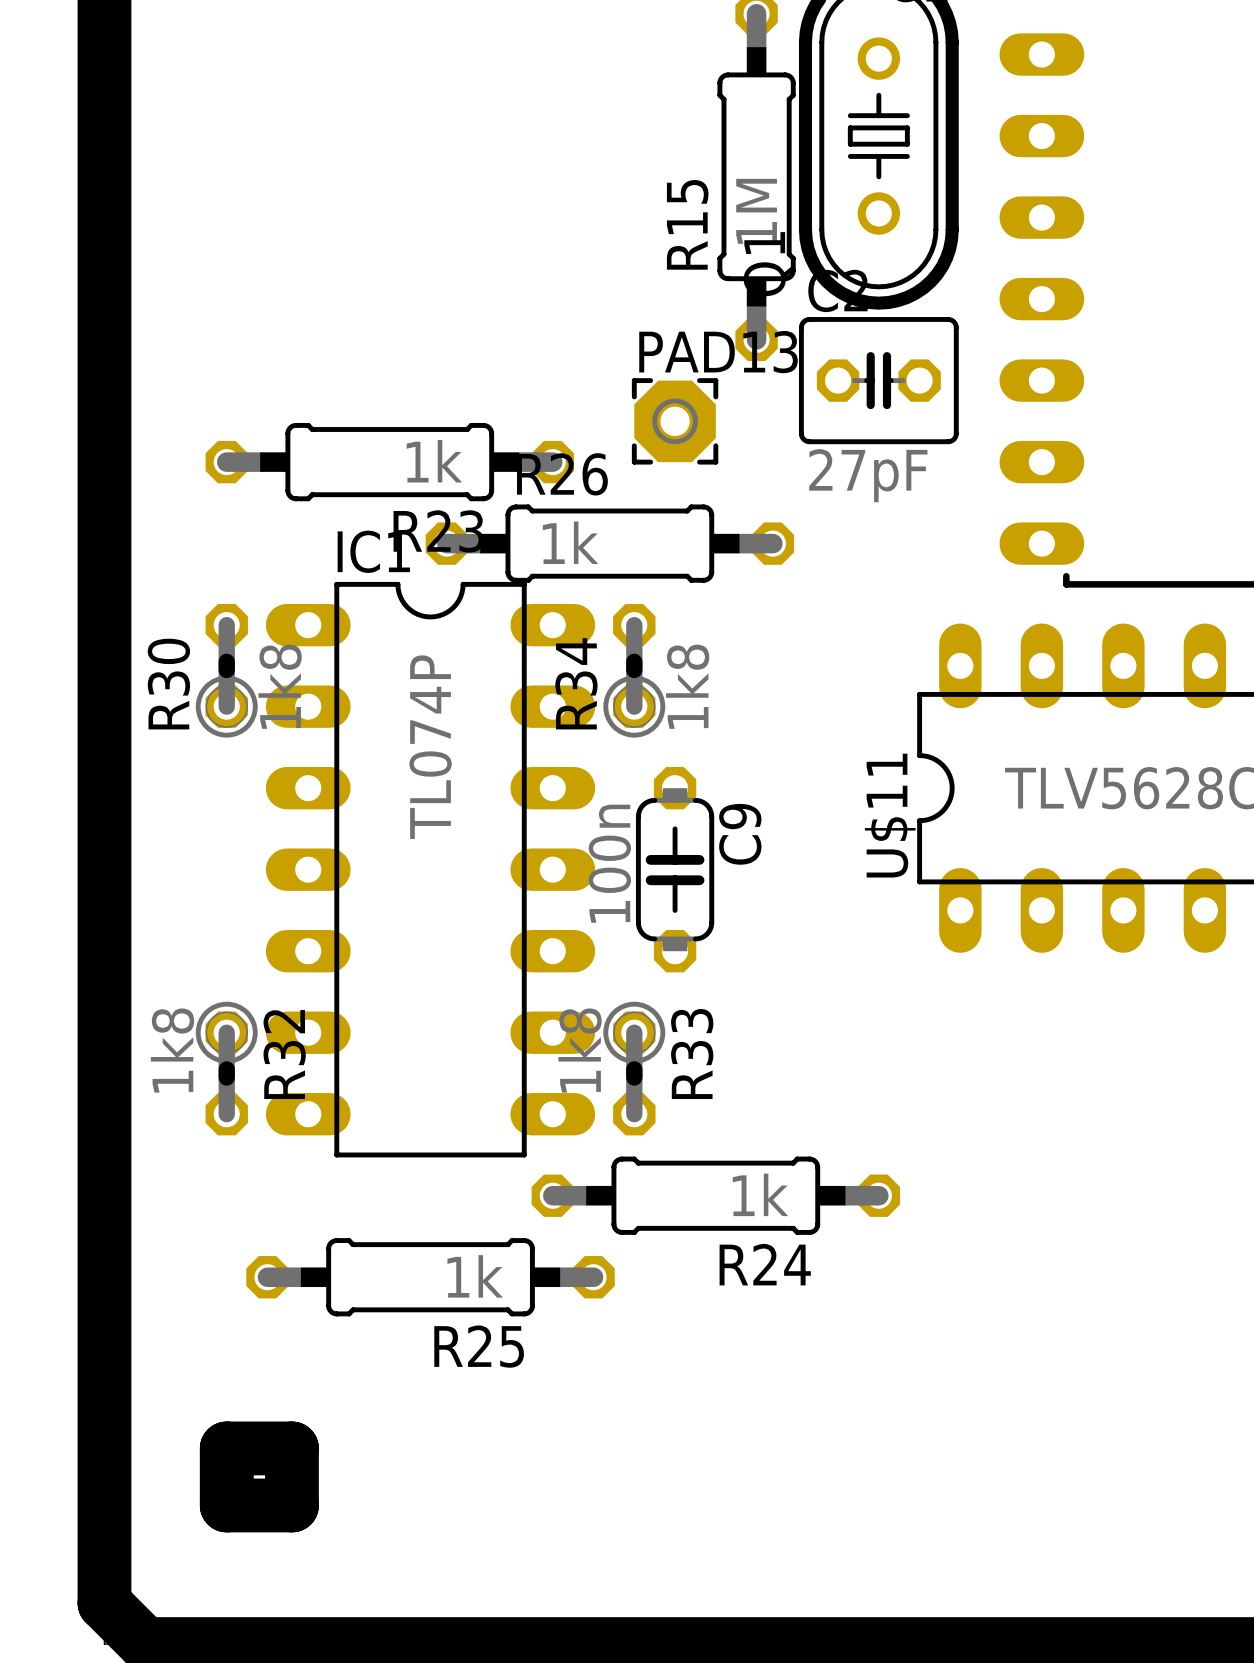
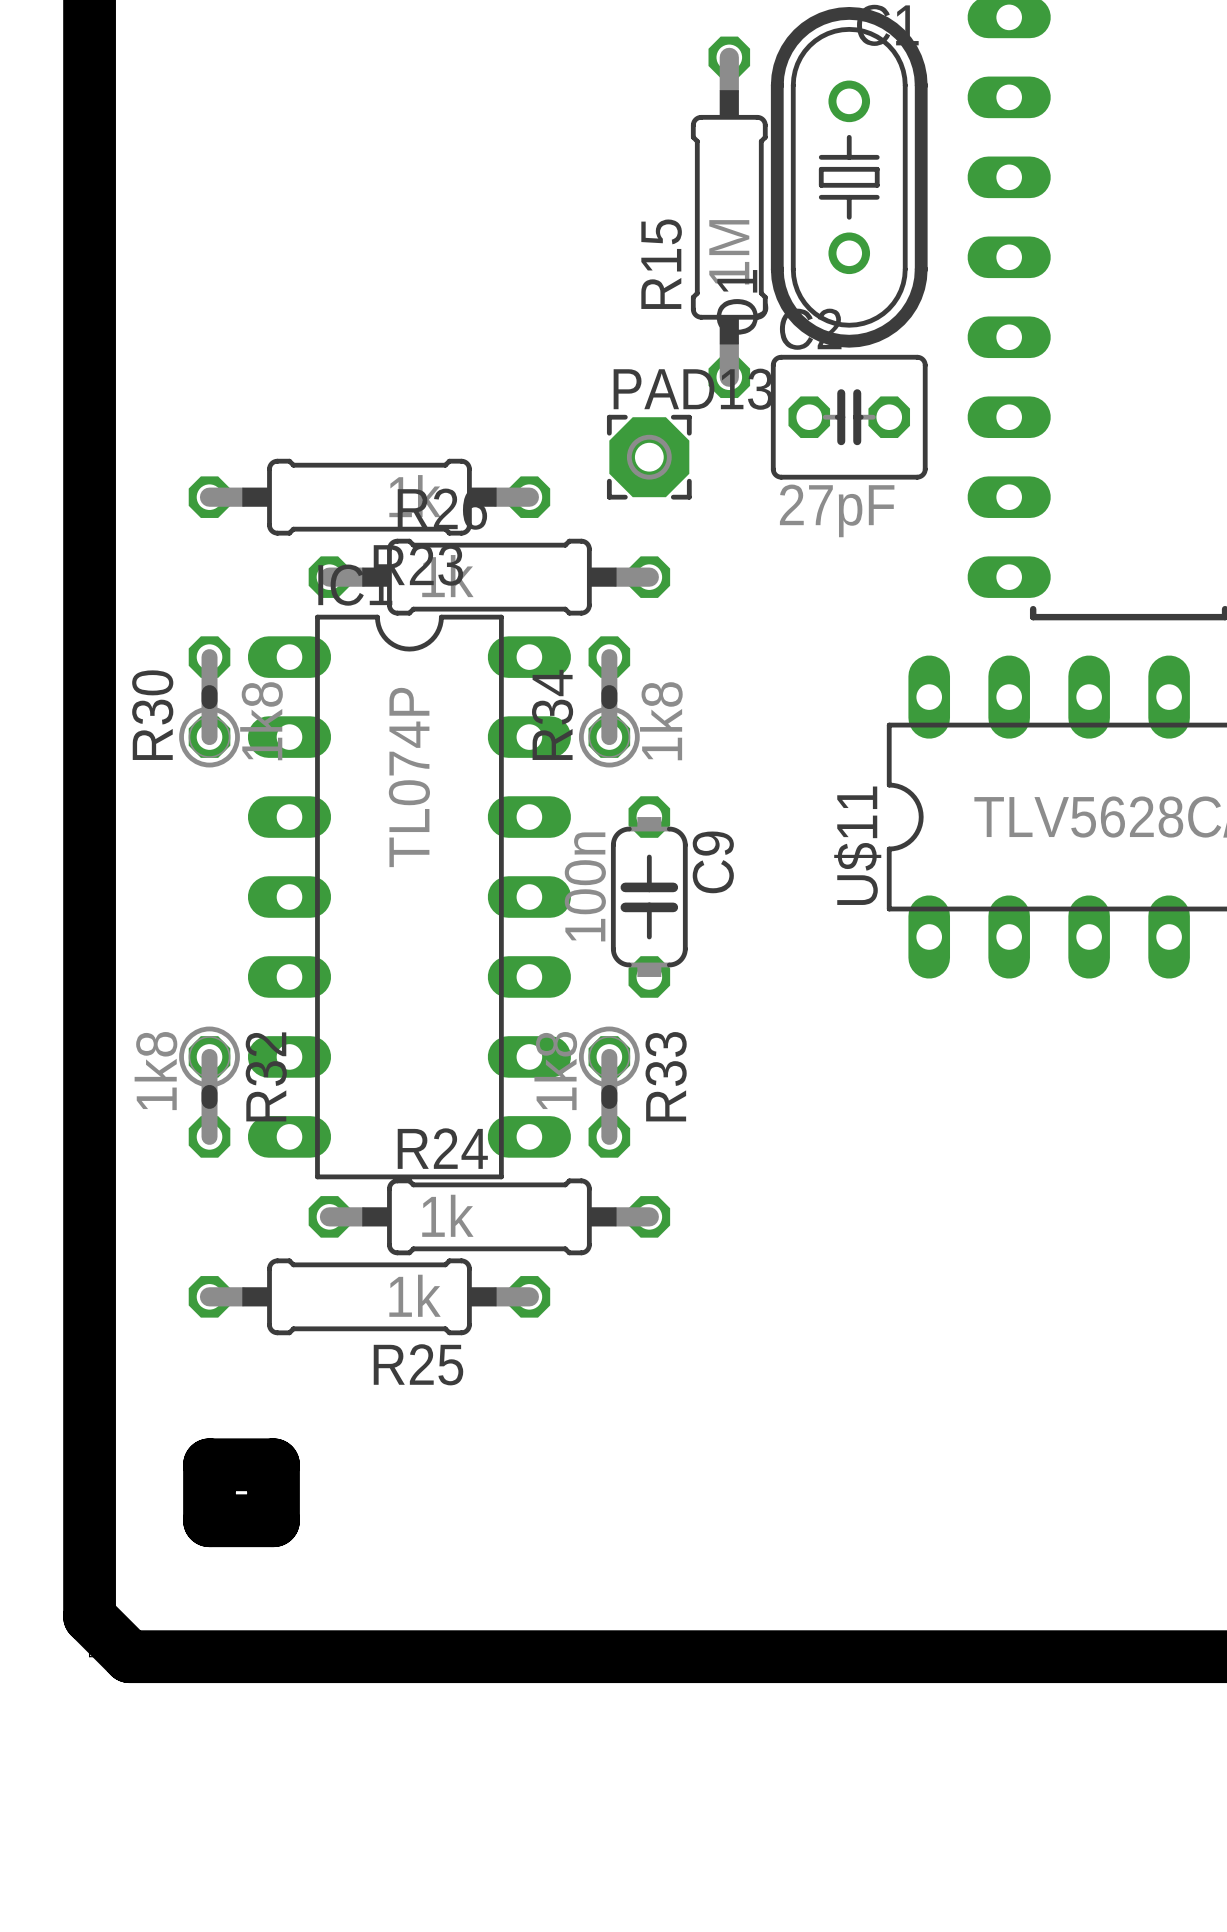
R26 position: (609, 543) -> (489, 577)
R24 value position: 1k (760, 1194) -> 1k (447, 1215)
R24 position: (715, 1195) -> (489, 1216)
R24 name position: R24 (765, 1264) -> R24 (442, 1148)
R25 position: (430, 1277) -> (369, 1296)

